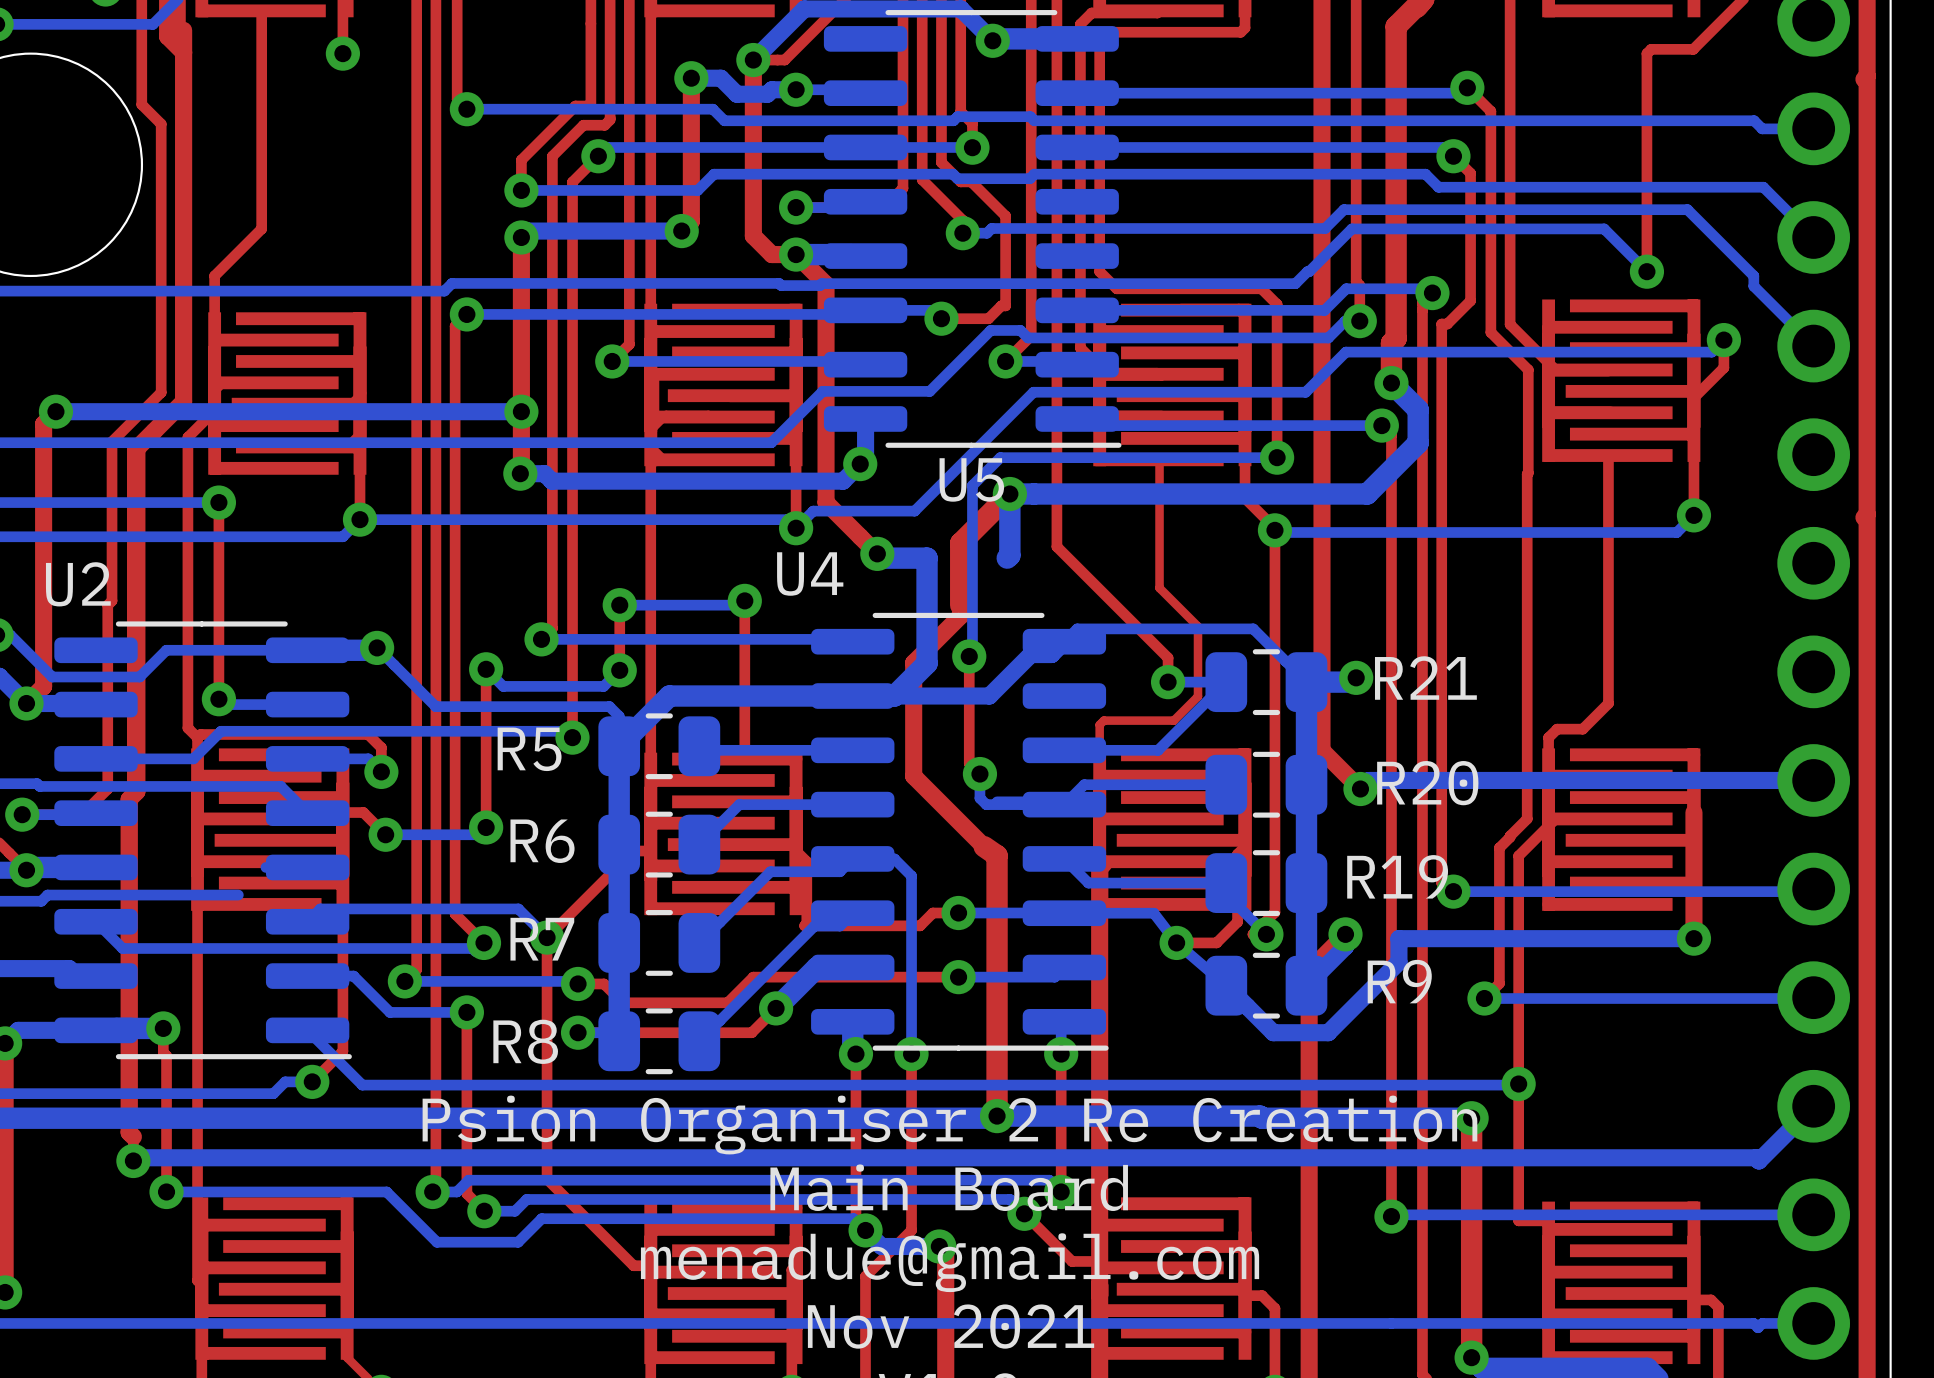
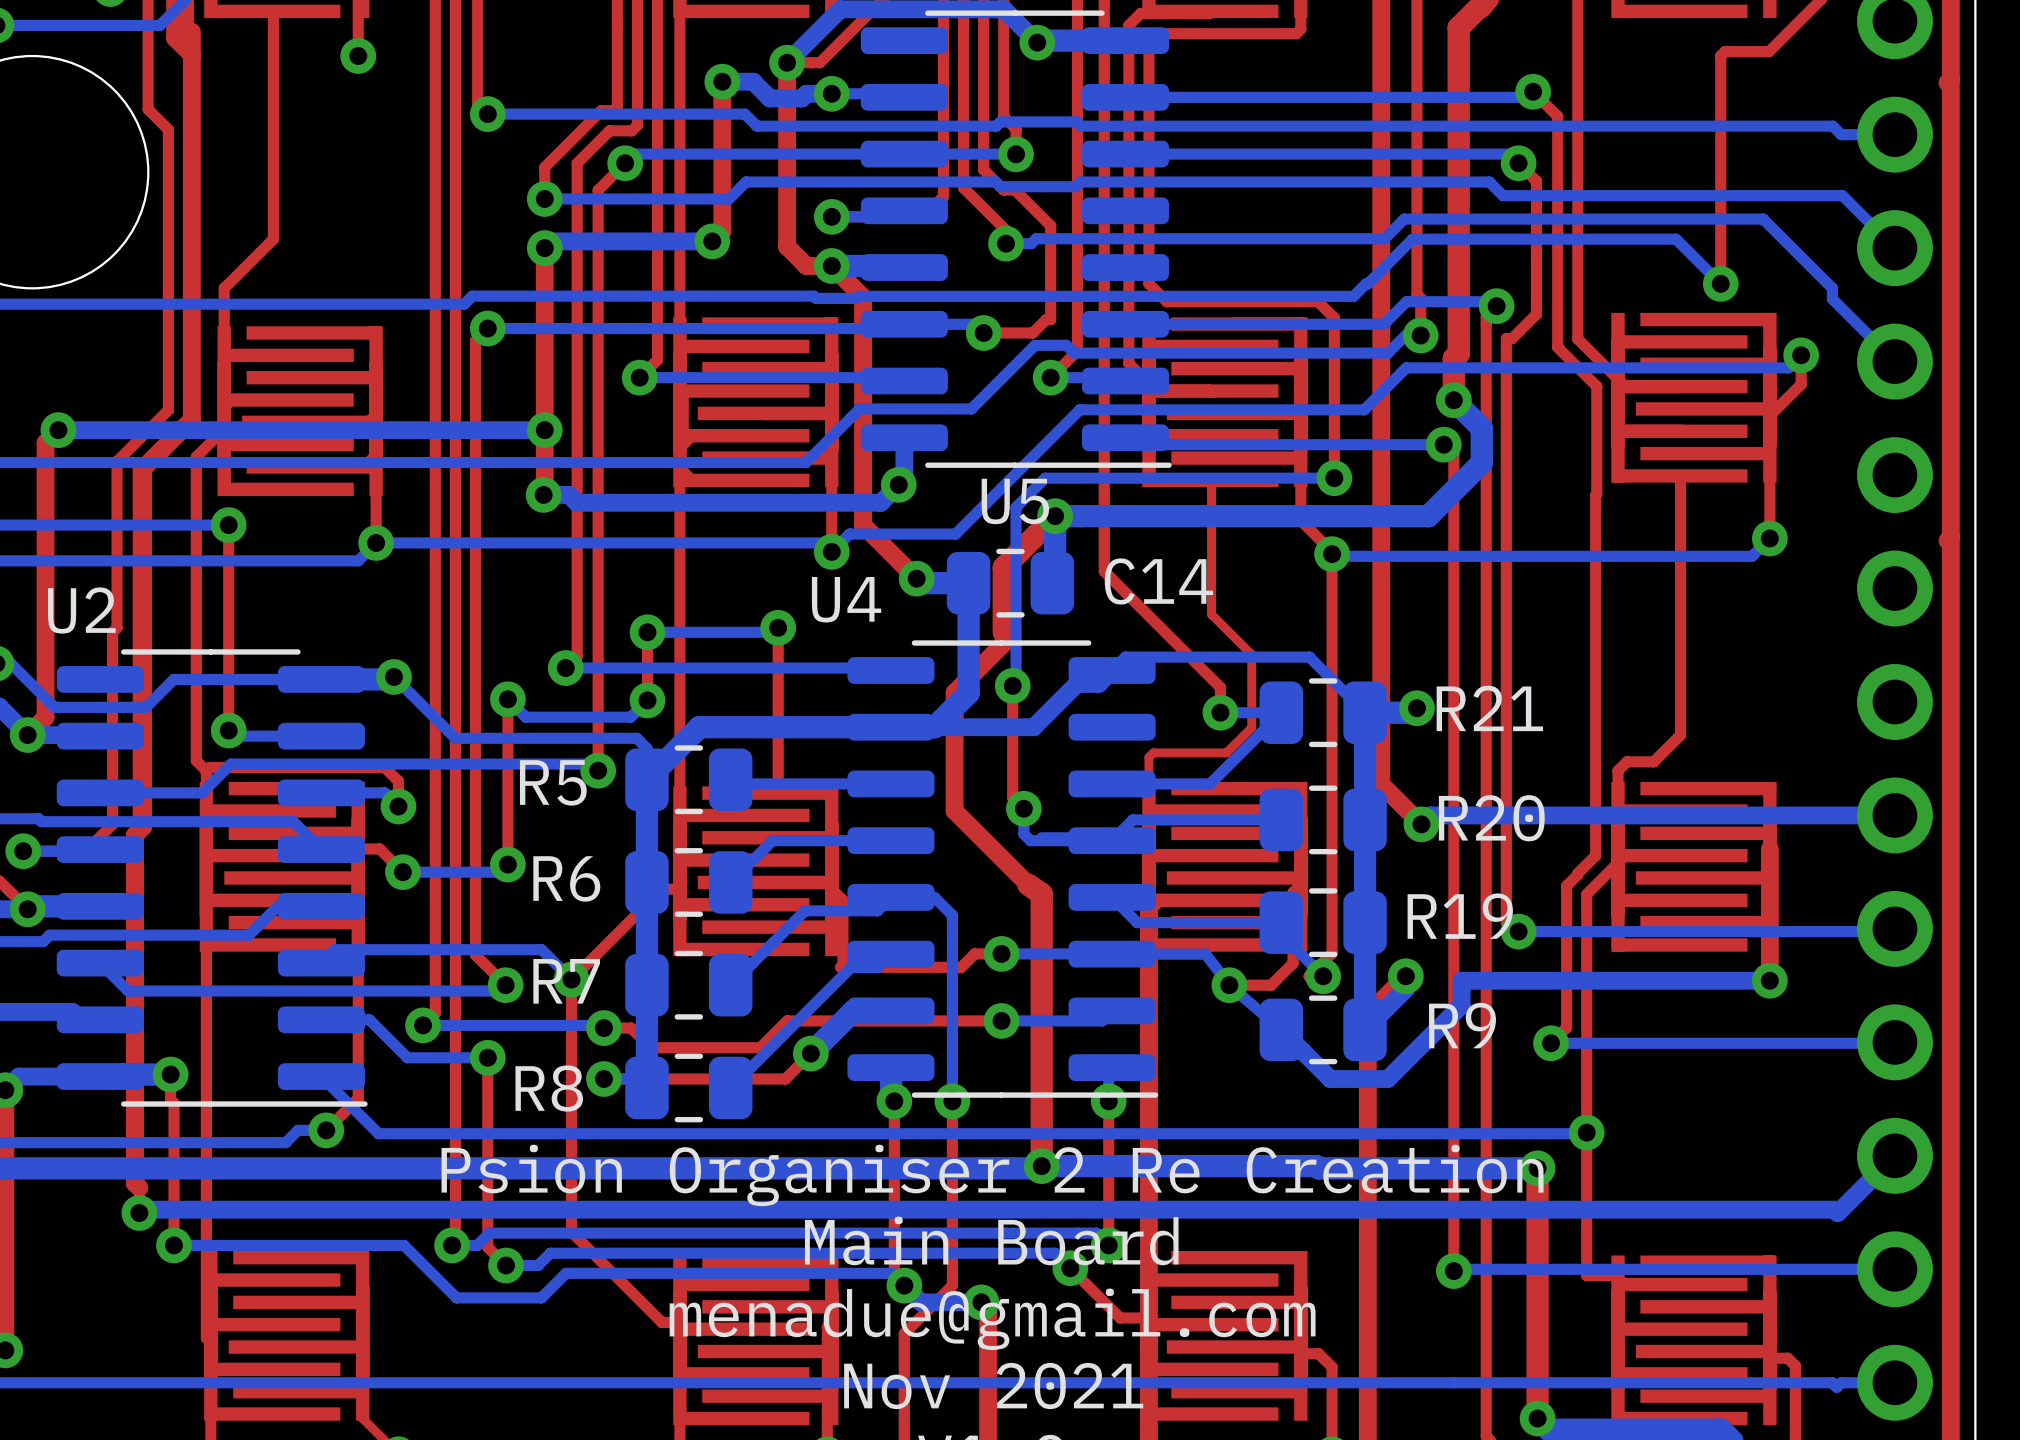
C14: none -> (1010, 583)
bottom track: none -> (277, 906) (249, 935)

